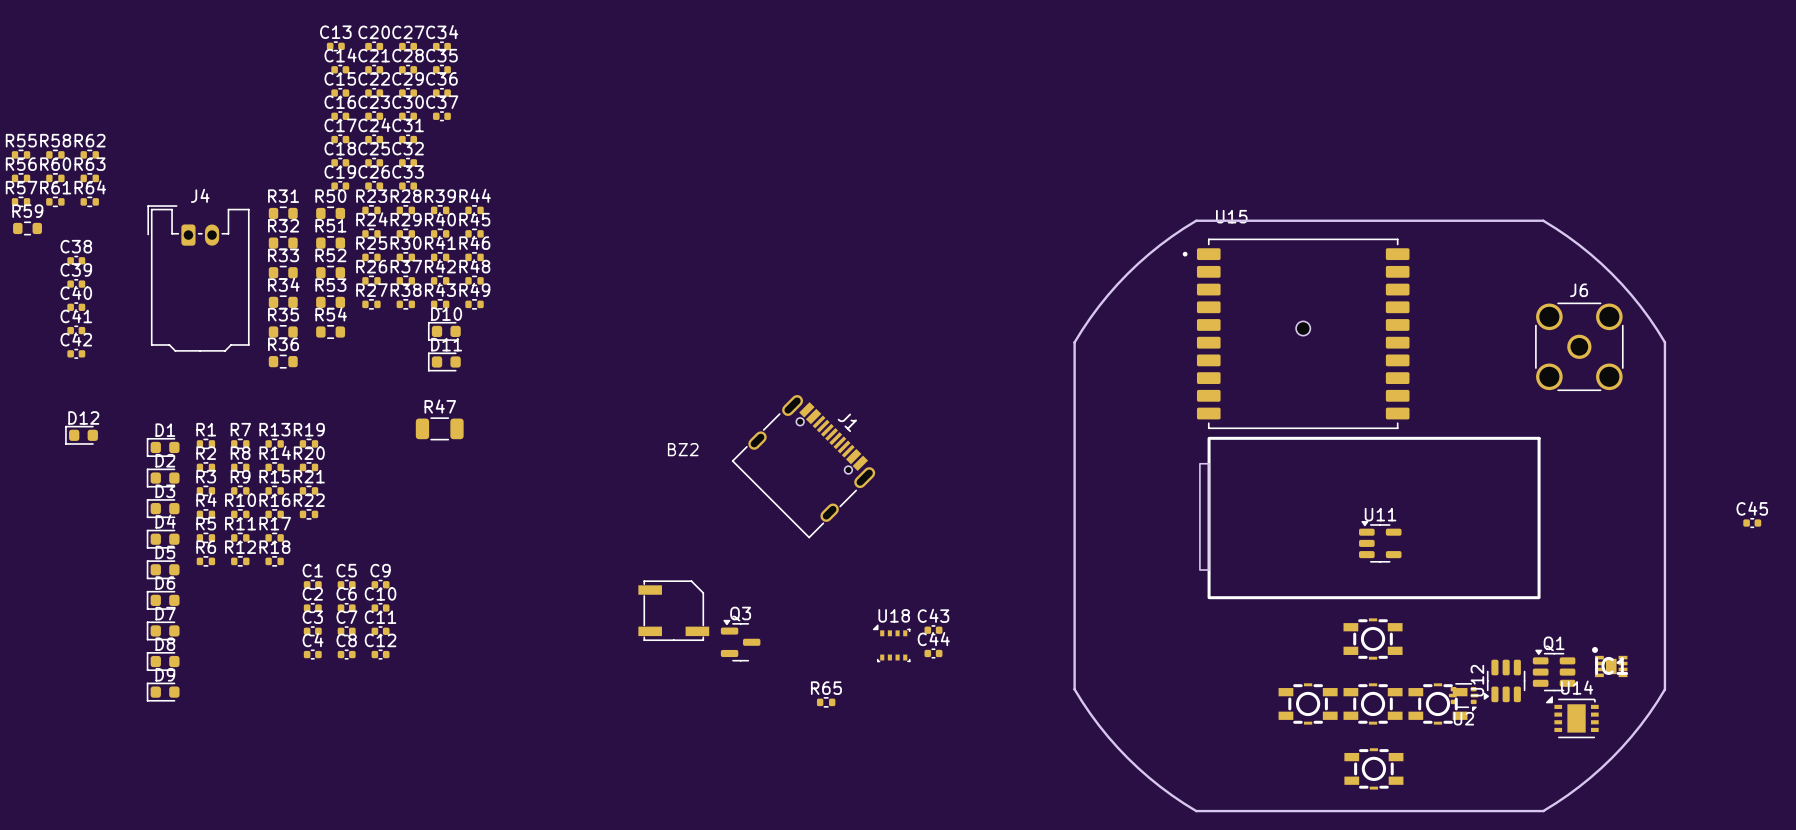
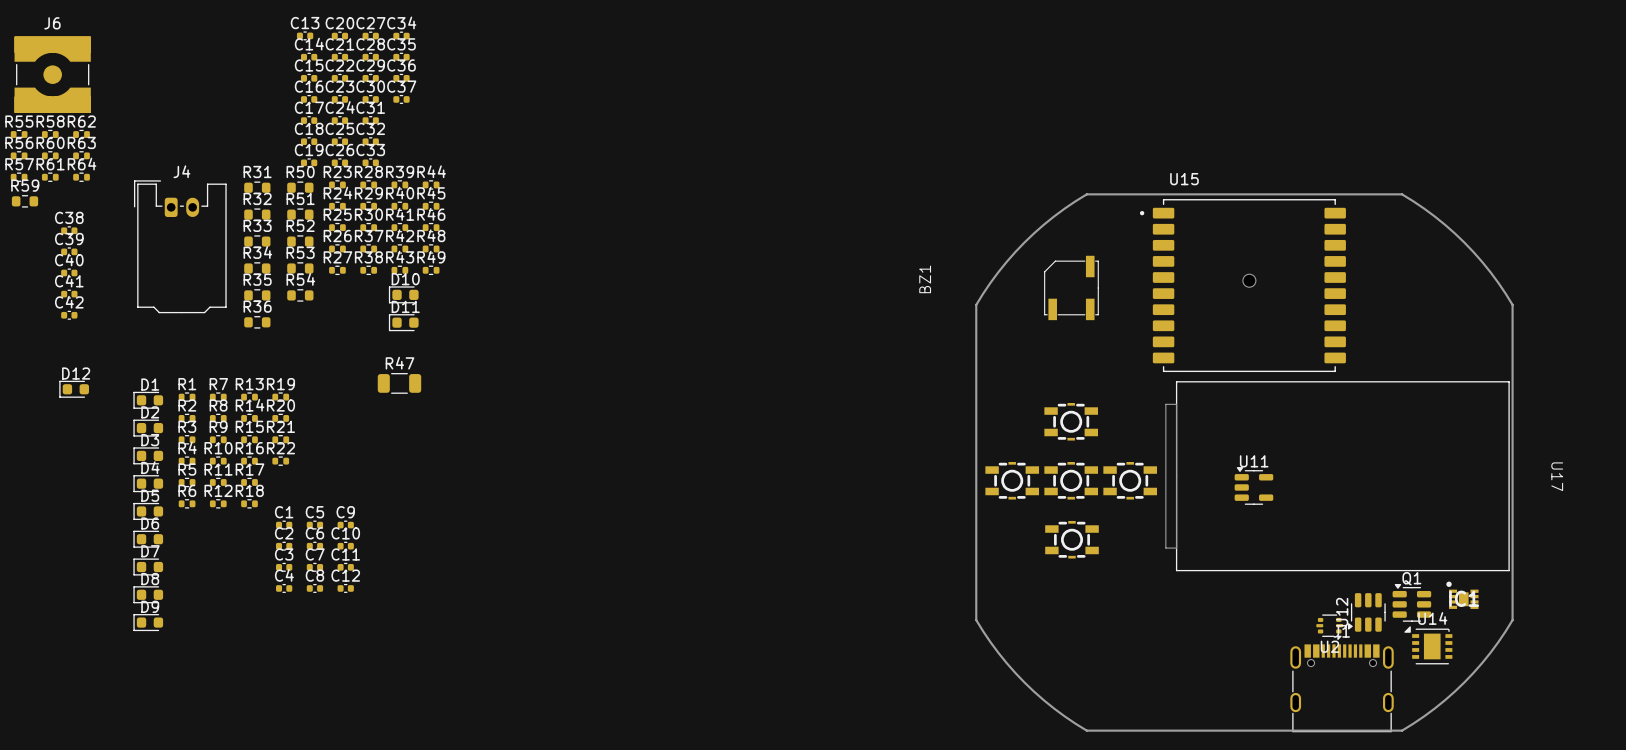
J6 footprint: [1535, 302, 1624, 391] -> [14, 36, 91, 113]
BZ1: none -> (1071, 287)
U15 position: (1296, 333) -> (1242, 285)
J1 rotation: 0° (803, 466) -> 45° counterclockwise (1342, 688)
J1 position: (803, 466) -> (1342, 688)
part: none -> (1071, 421)
part: (1369, 518) -> none
C45: (1752, 523) -> none
U17: none -> (1337, 476)
part: none -> (1012, 480)
part: none -> (1071, 480)
part: none -> (1130, 480)
part: none -> (1072, 539)
BZ2: (673, 610) -> none
C43: (933, 630) -> none
part: (1373, 639) -> none
Q3: (740, 640) -> none
U18: (891, 643) -> none
C44: (933, 653) -> none
R65: (826, 702) -> none
part: (1308, 703) -> none
part: (1373, 703) -> none
part: (1437, 703) -> none
part: (1373, 768) -> none

